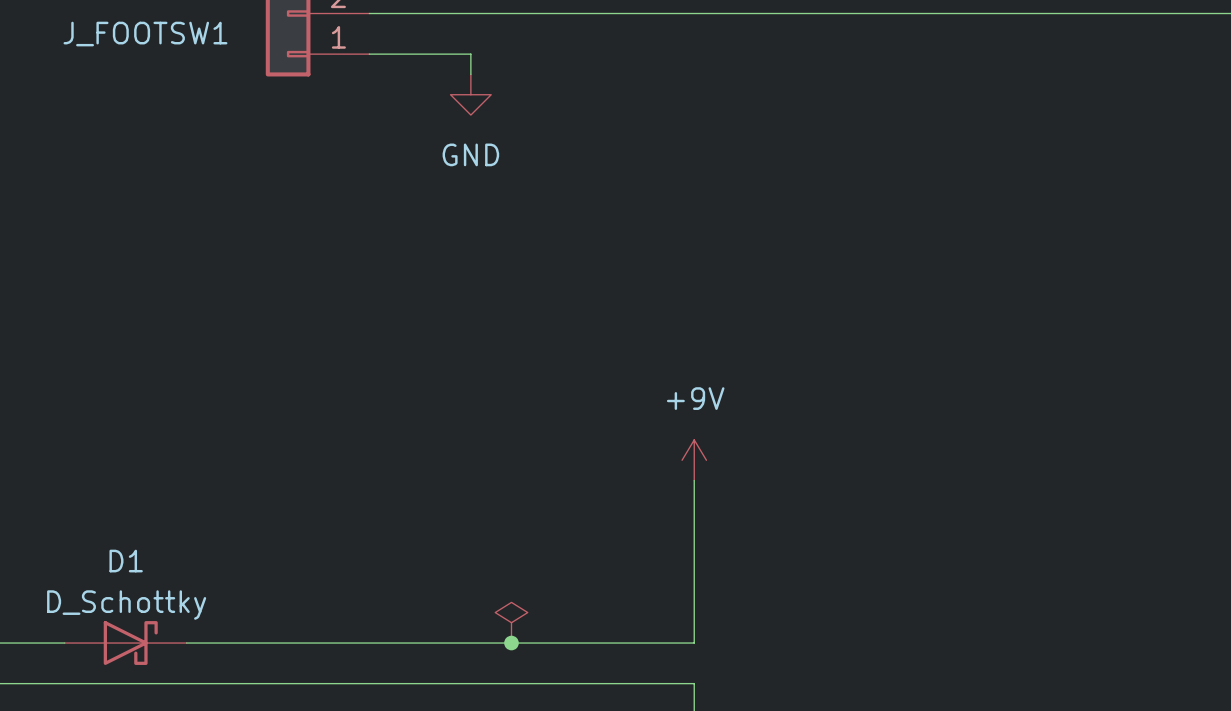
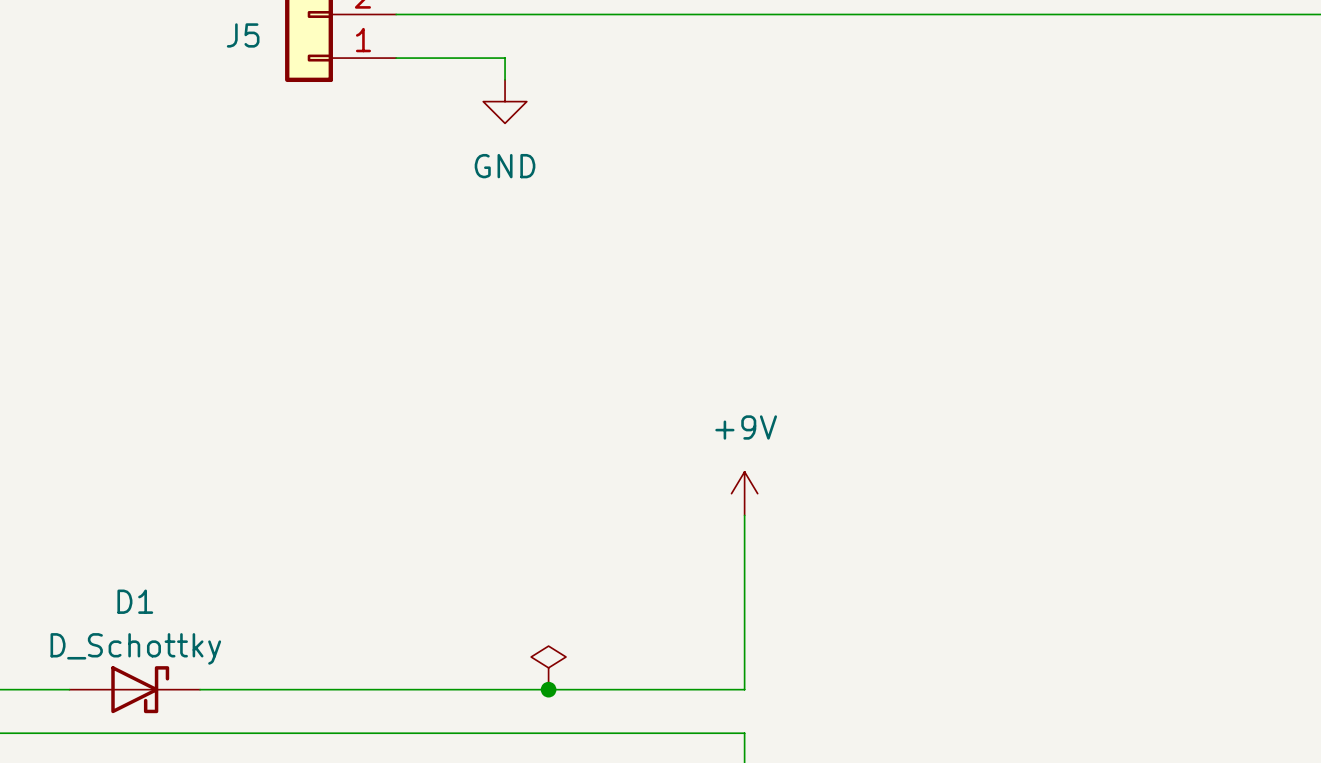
J_FOOTSW1 name: J_FOOTSW1 (145, 34) -> J5 (243, 35)

